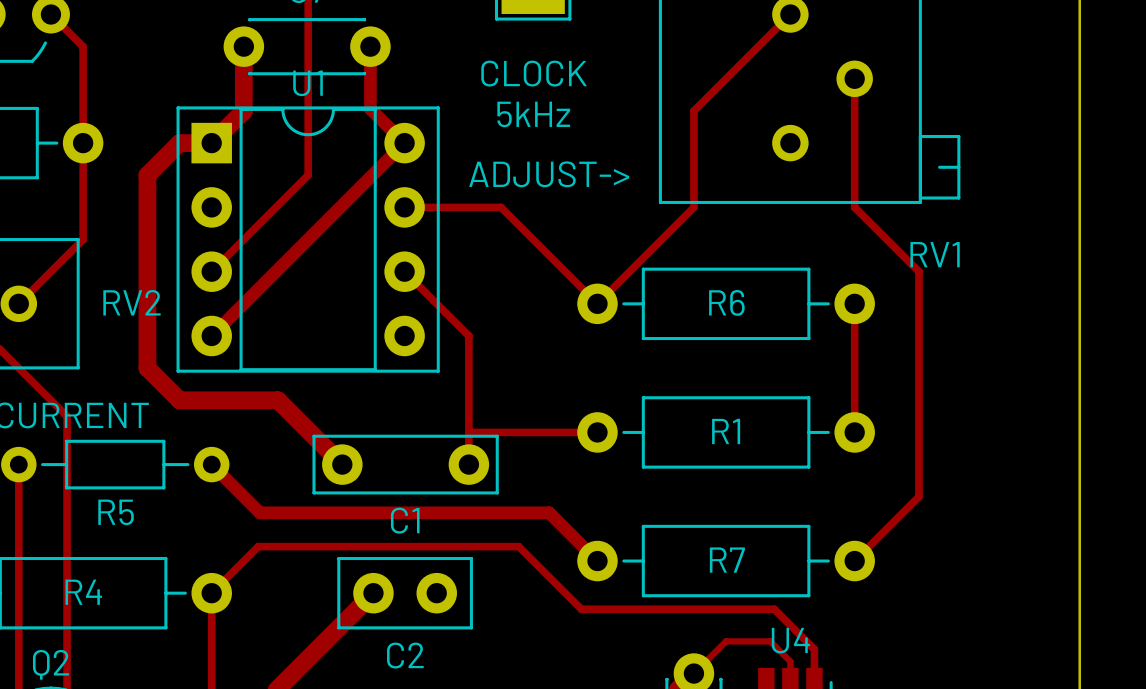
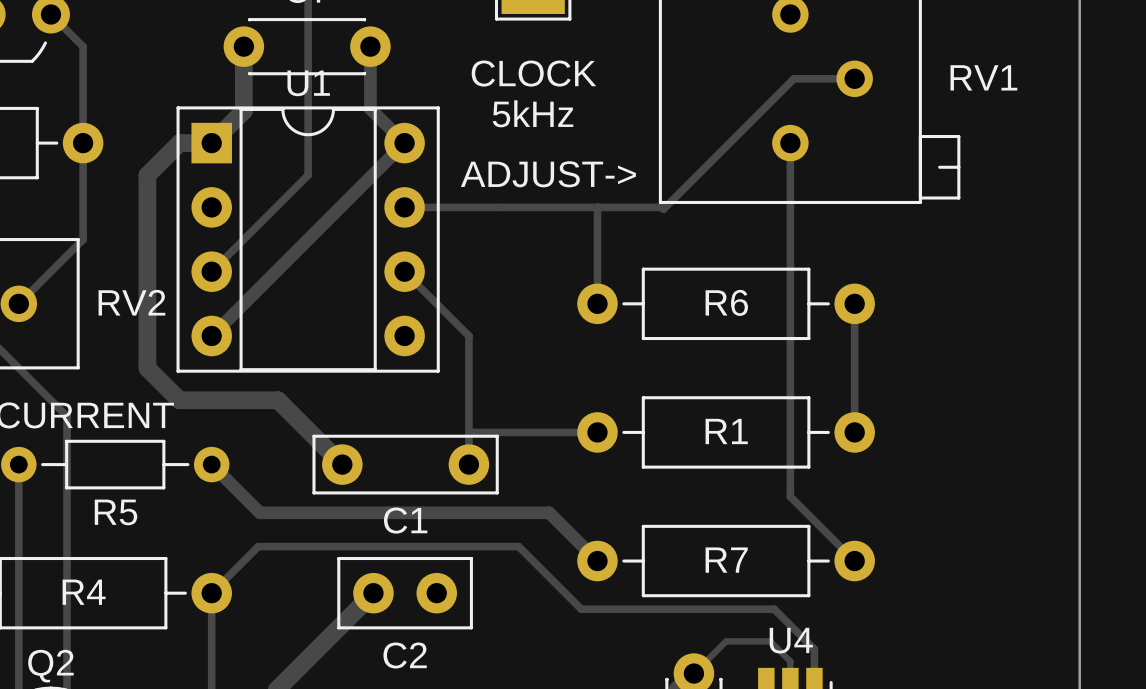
track: (790, 14) (693, 110) (693, 207) (597, 303) (501, 207) -> (854, 78) (793, 78) (663, 209) (661, 207) (501, 207)
track: (854, 78) (854, 207) (918, 271) (918, 496) (854, 561) -> (790, 143) (790, 496) (854, 561)
track: none -> (597, 207) (597, 303)
RV1 name position: RV1 (935, 254) -> RV1 (983, 77)

